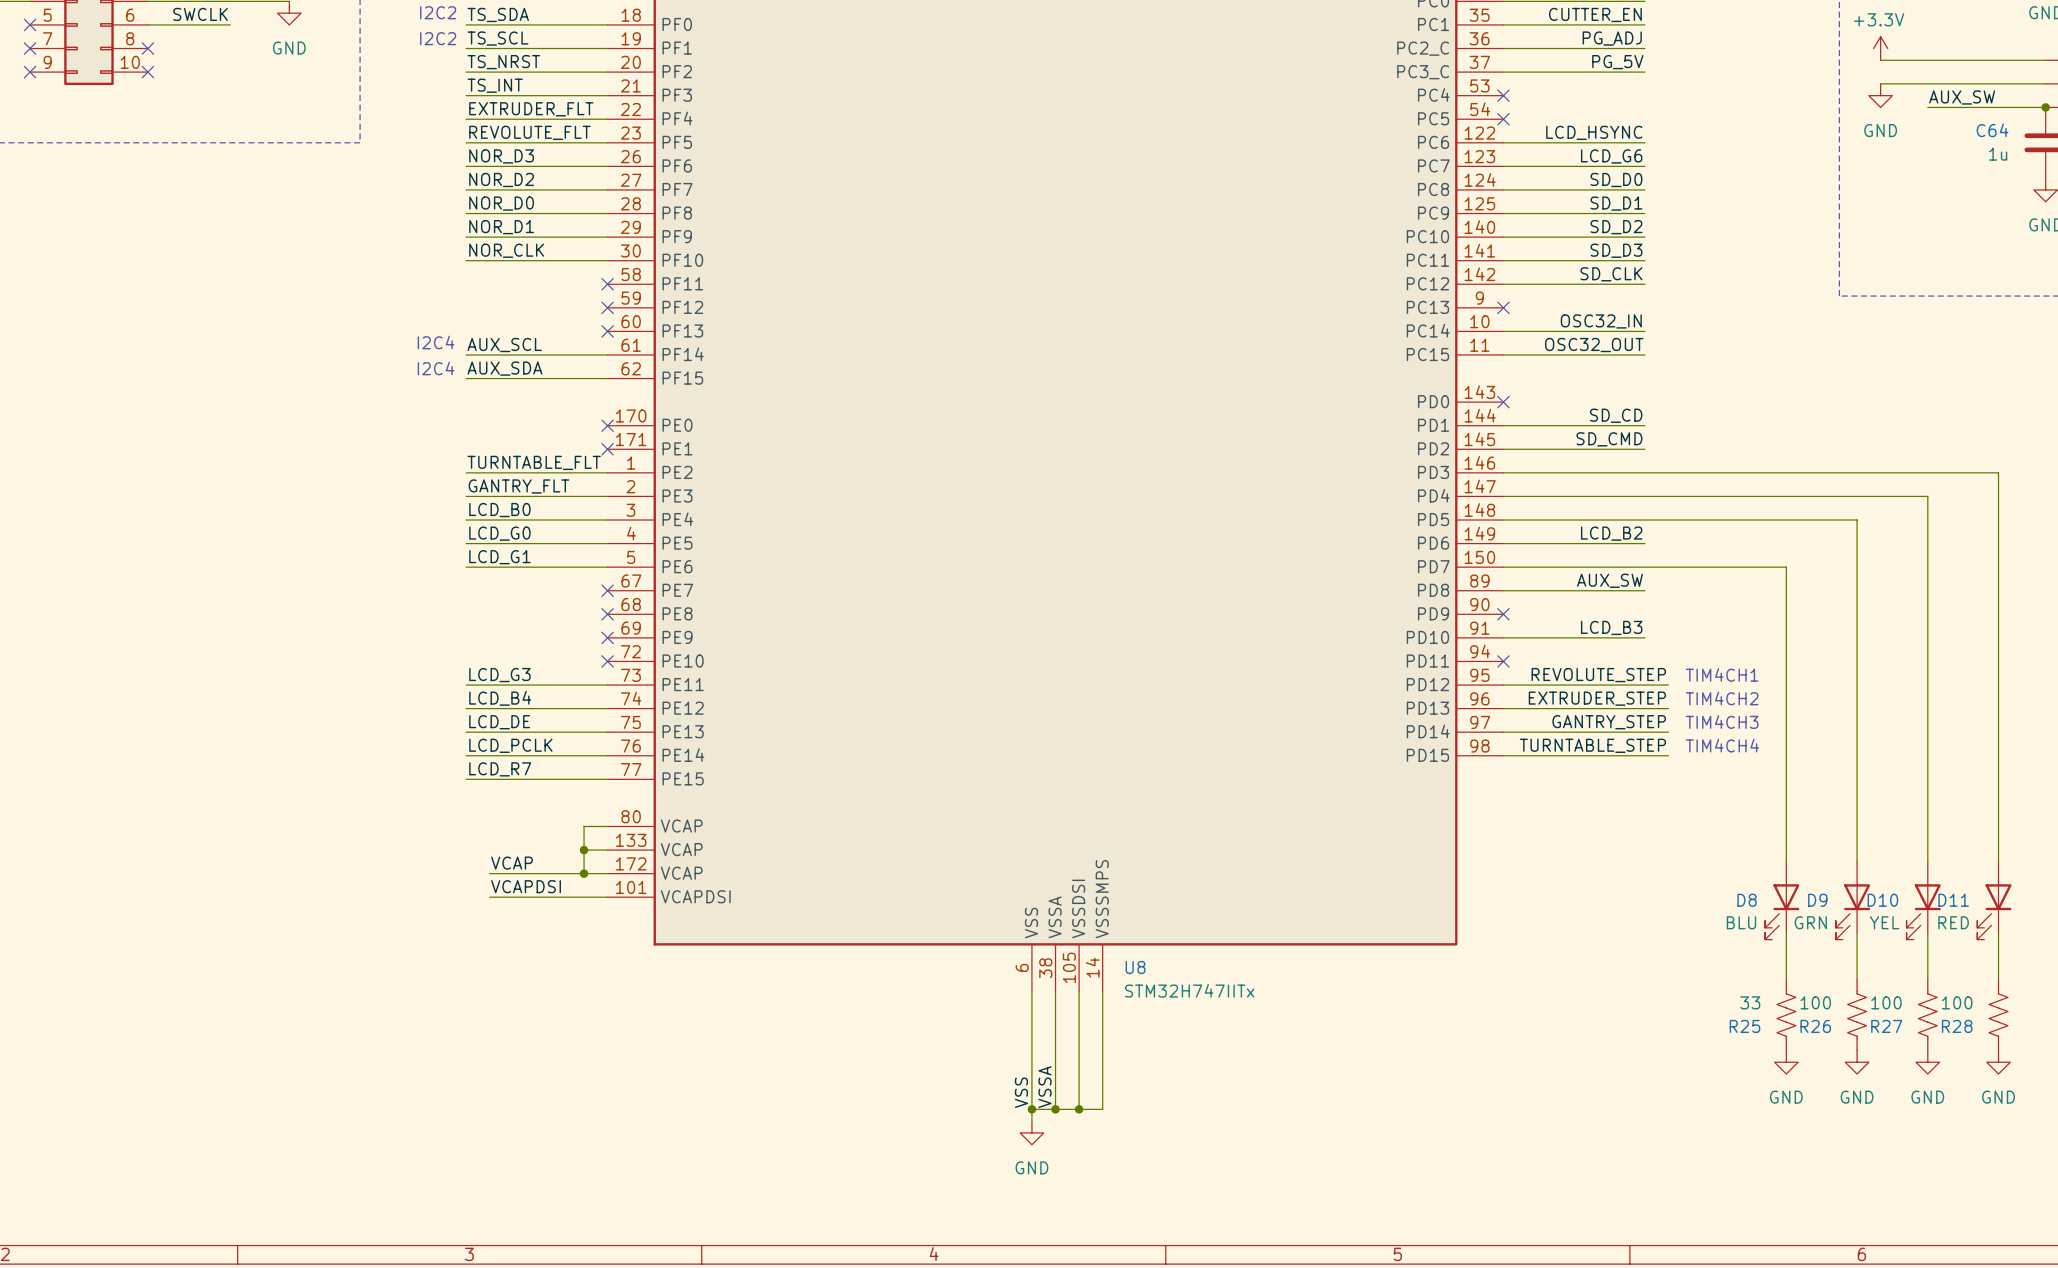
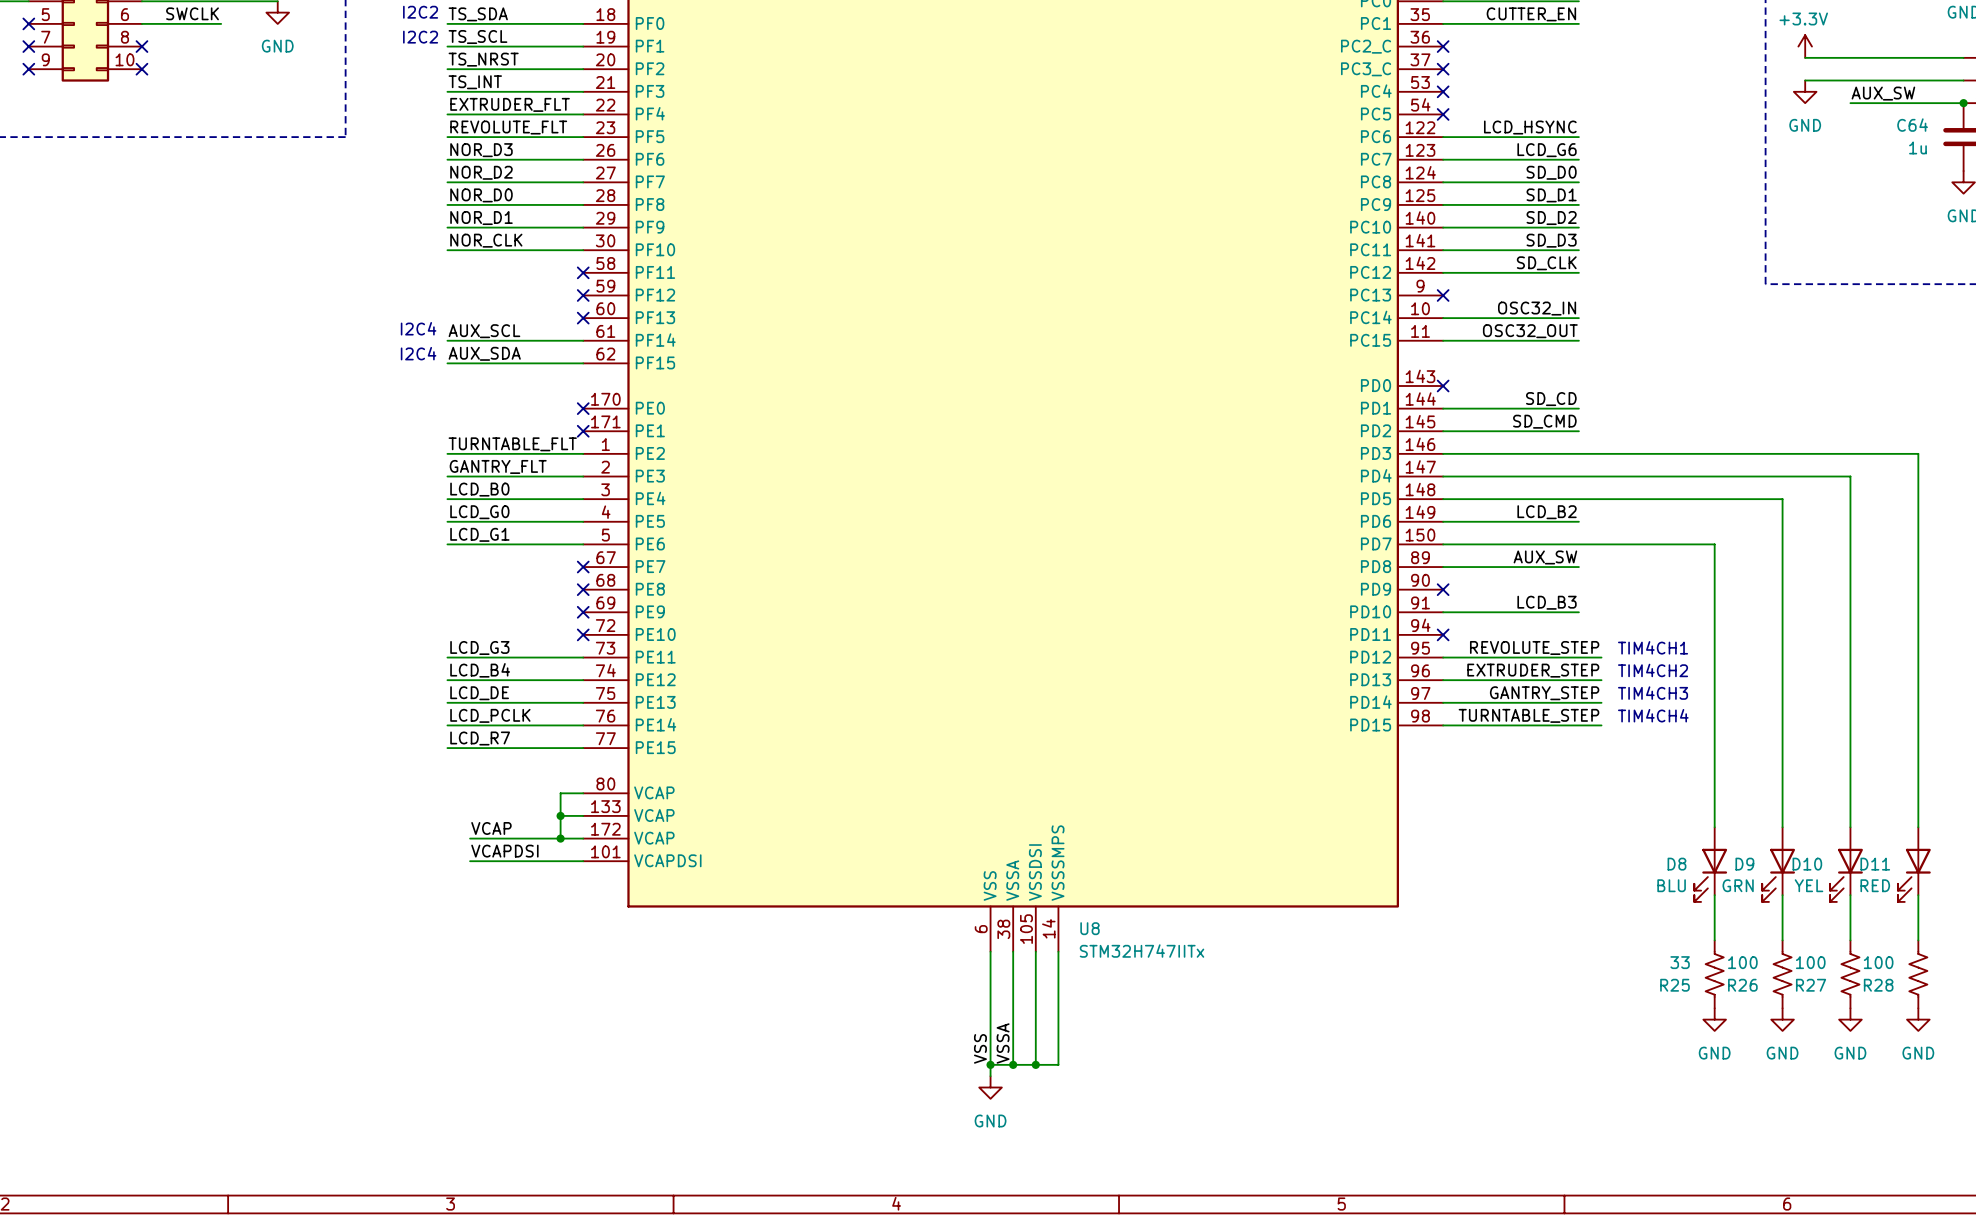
label: PG_ADJ (1612, 38) -> none
wire: (1503, 48) (1644, 48) -> none
no-connect mark: none -> (1443, 46)
label: PG_5V (1617, 62) -> none
wire: (1503, 72) (1644, 72) -> none
no-connect mark: none -> (1443, 69)

